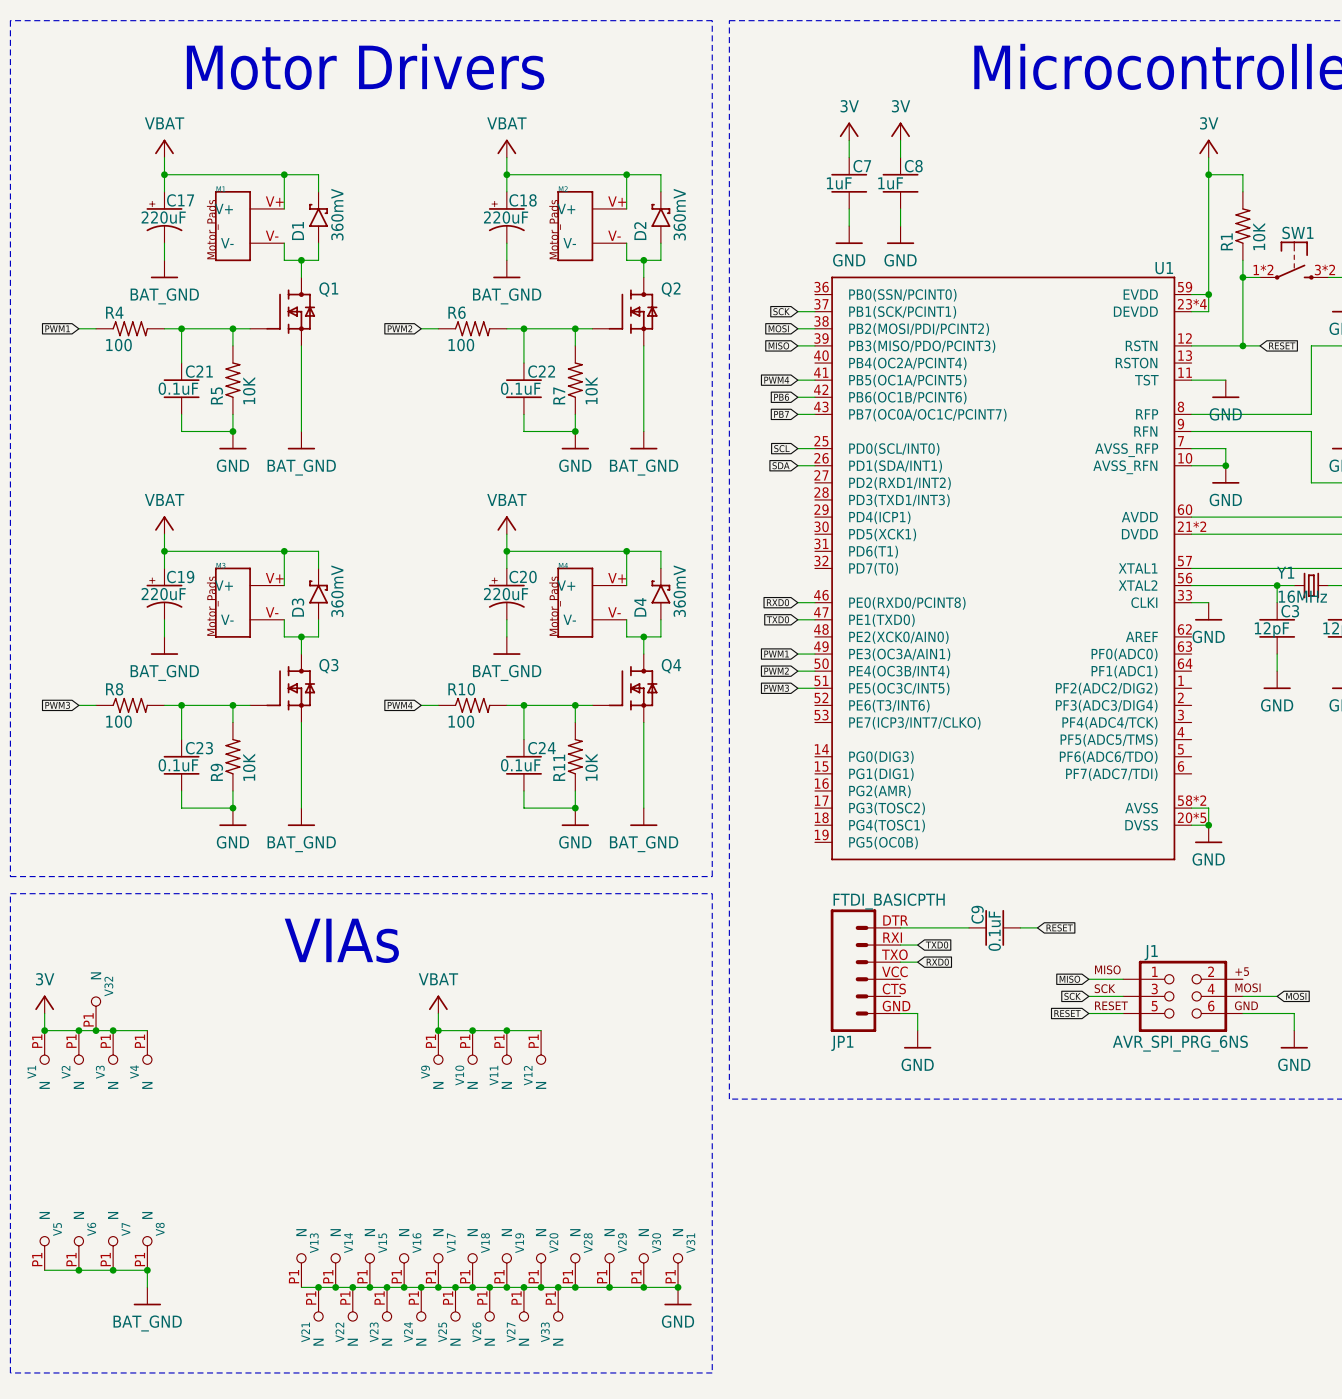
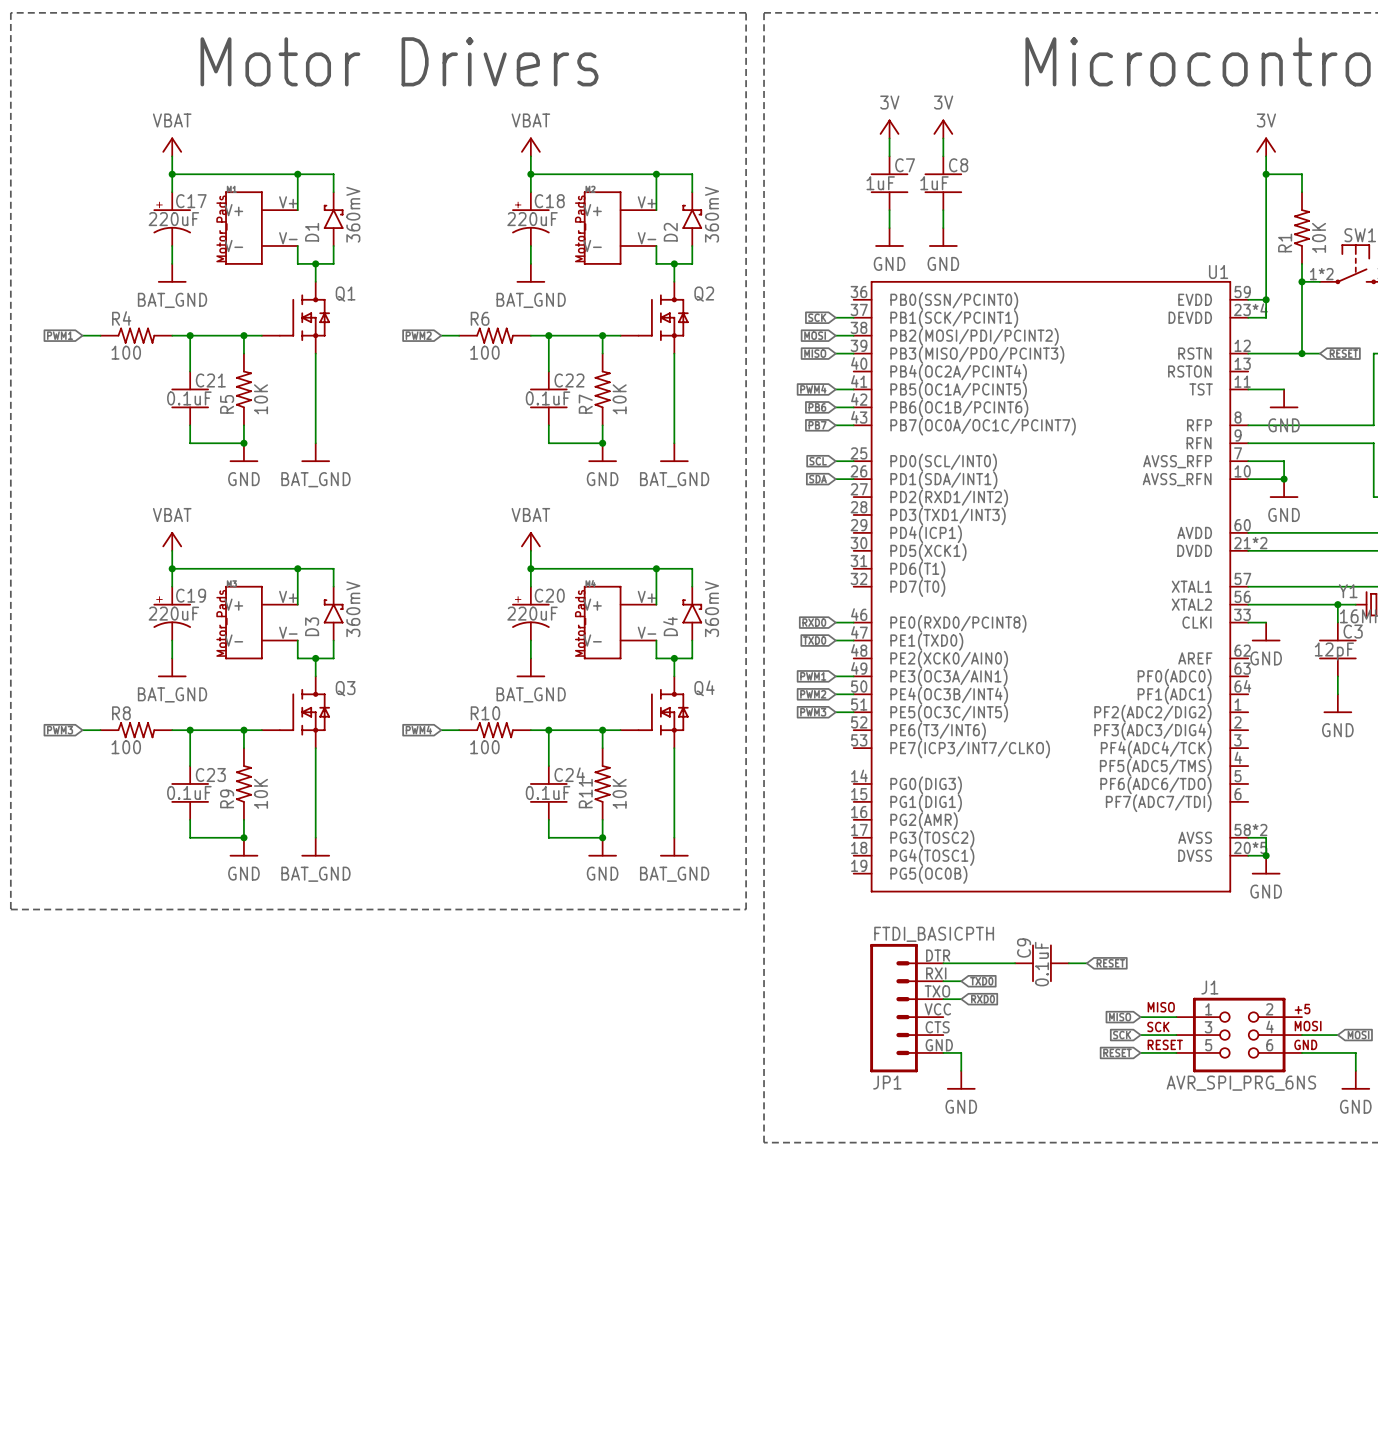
line: (10, 893) (712, 893) (712, 1372) (10, 1372) (10, 893) -> none
text: VIAs (341, 940) -> none
power symbol: 3V (44, 1004) -> none
power symbol: VBAT (438, 1004) -> none
wire: (44, 1013) (44, 1030) (147, 1030) -> none
V32: (96, 1013) -> none
wire: (438, 1013) (438, 1030) (541, 1030) -> none
junction: (44, 1030) -> none
junction: (78, 1030) -> none
junction: (96, 1030) -> none
junction: (113, 1030) -> none
junction: (438, 1030) -> none
junction: (472, 1030) -> none
junction: (506, 1030) -> none
V1: (44, 1047) -> none
V2: (78, 1047) -> none
V3: (113, 1047) -> none
V4: (147, 1047) -> none
V9: (438, 1047) -> none
V10: (472, 1047) -> none
V11: (506, 1047) -> none
V12: (541, 1047) -> none
V5: (44, 1253) -> none
V6: (78, 1253) -> none
V7: (113, 1253) -> none
V8: (147, 1253) -> none
wire: (44, 1270) (147, 1270) (147, 1287) -> none
junction: (78, 1270) -> none
junction: (113, 1270) -> none
junction: (147, 1270) -> none
V13: (301, 1270) -> none
V14: (335, 1270) -> none
V15: (369, 1270) -> none
V16: (404, 1270) -> none
V17: (438, 1270) -> none
V18: (472, 1270) -> none
V19: (506, 1270) -> none
V20: (541, 1270) -> none
V28: (575, 1270) -> none
V29: (609, 1270) -> none
V30: (643, 1270) -> none
V31: (678, 1270) -> none
wire: (301, 1287) (678, 1287) -> none
junction: (318, 1287) -> none
junction: (335, 1287) -> none
junction: (352, 1287) -> none
junction: (369, 1287) -> none
junction: (387, 1287) -> none
junction: (404, 1287) -> none
junction: (421, 1287) -> none
junction: (438, 1287) -> none
junction: (455, 1287) -> none
junction: (472, 1287) -> none
junction: (489, 1287) -> none
junction: (506, 1287) -> none
junction: (523, 1287) -> none
junction: (541, 1287) -> none
junction: (558, 1287) -> none
junction: (575, 1287) -> none
junction: (609, 1287) -> none
junction: (643, 1287) -> none
junction: (678, 1287) -> none
power symbol: BAT_GND (147, 1296) -> none
power symbol: GND (678, 1296) -> none
V21: (318, 1304) -> none
V22: (352, 1304) -> none
V23: (387, 1304) -> none
V24: (421, 1304) -> none
V25: (455, 1304) -> none
V26: (489, 1304) -> none
V27: (523, 1304) -> none
V33: (558, 1304) -> none

